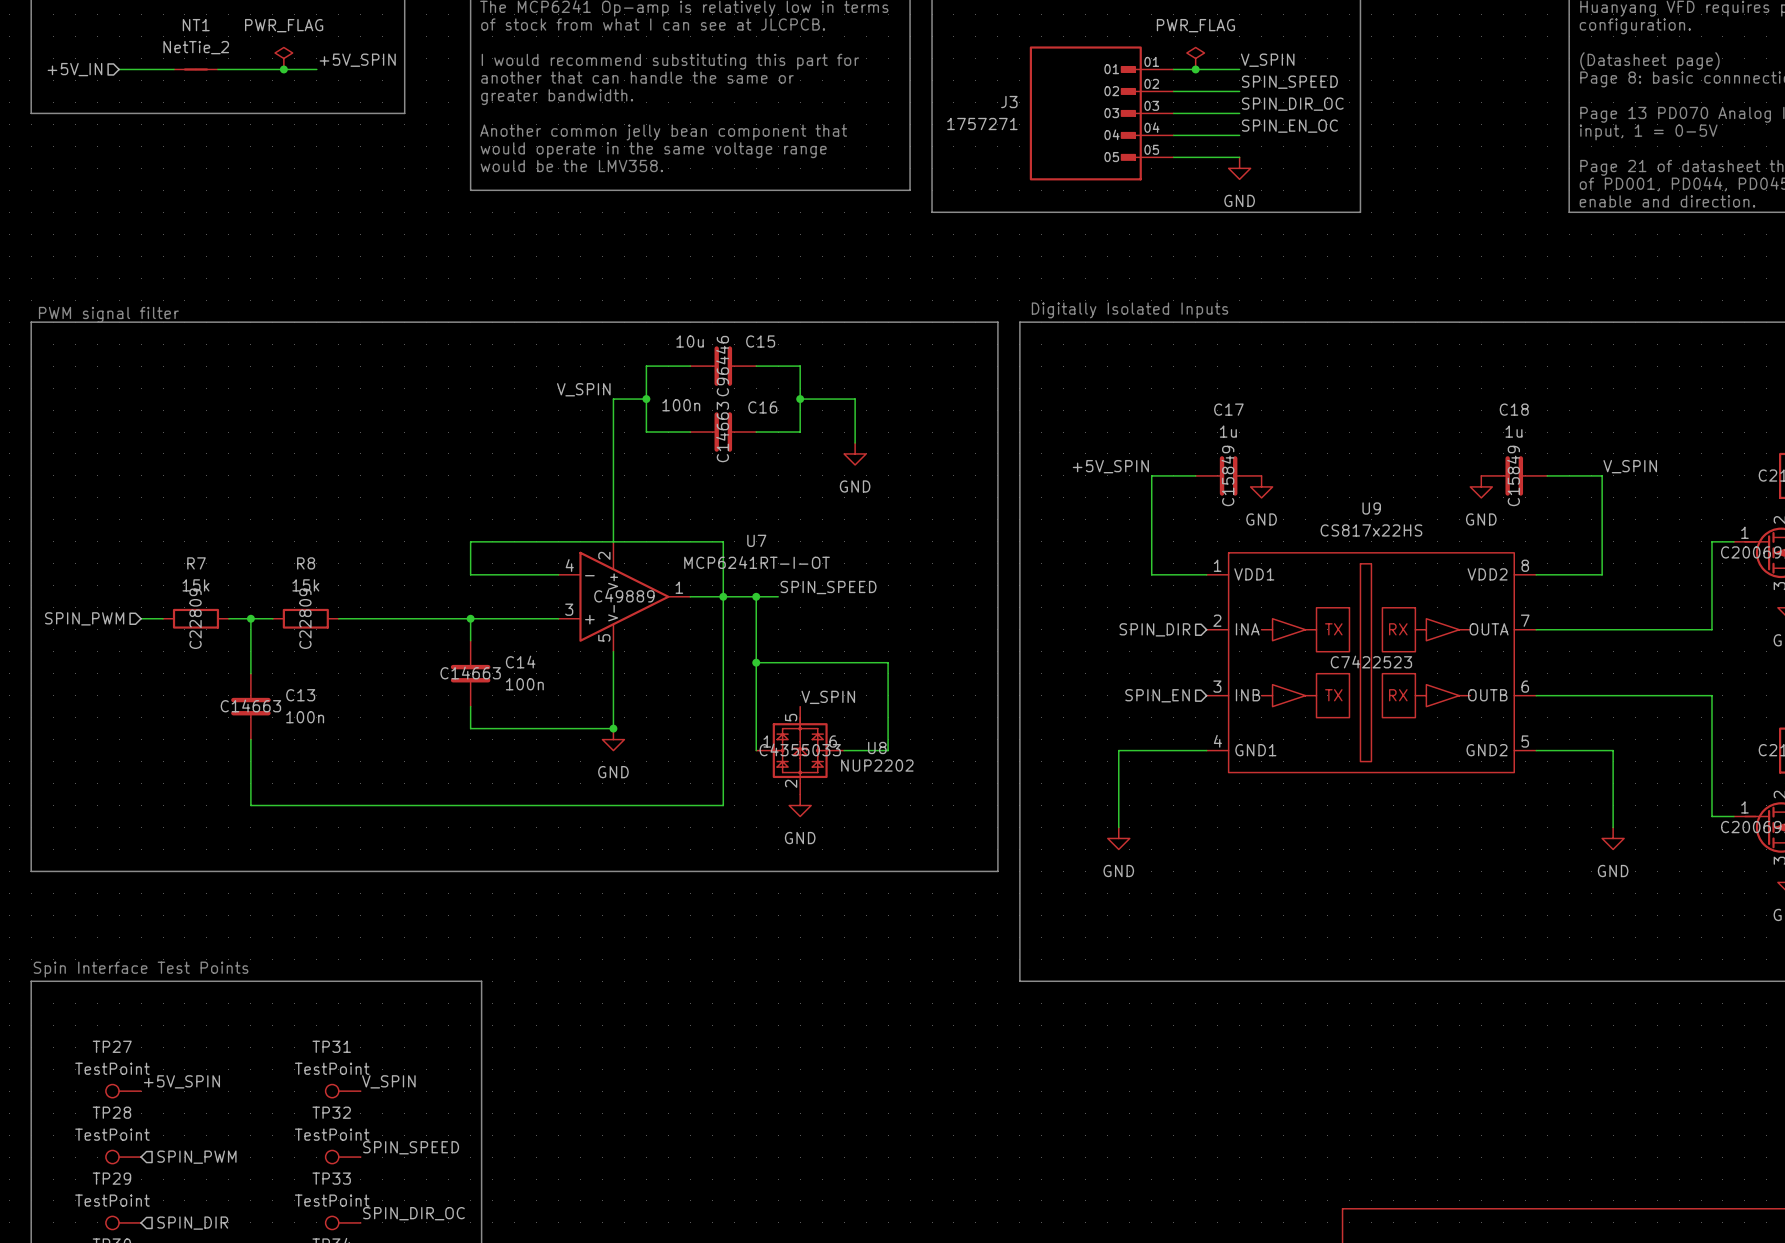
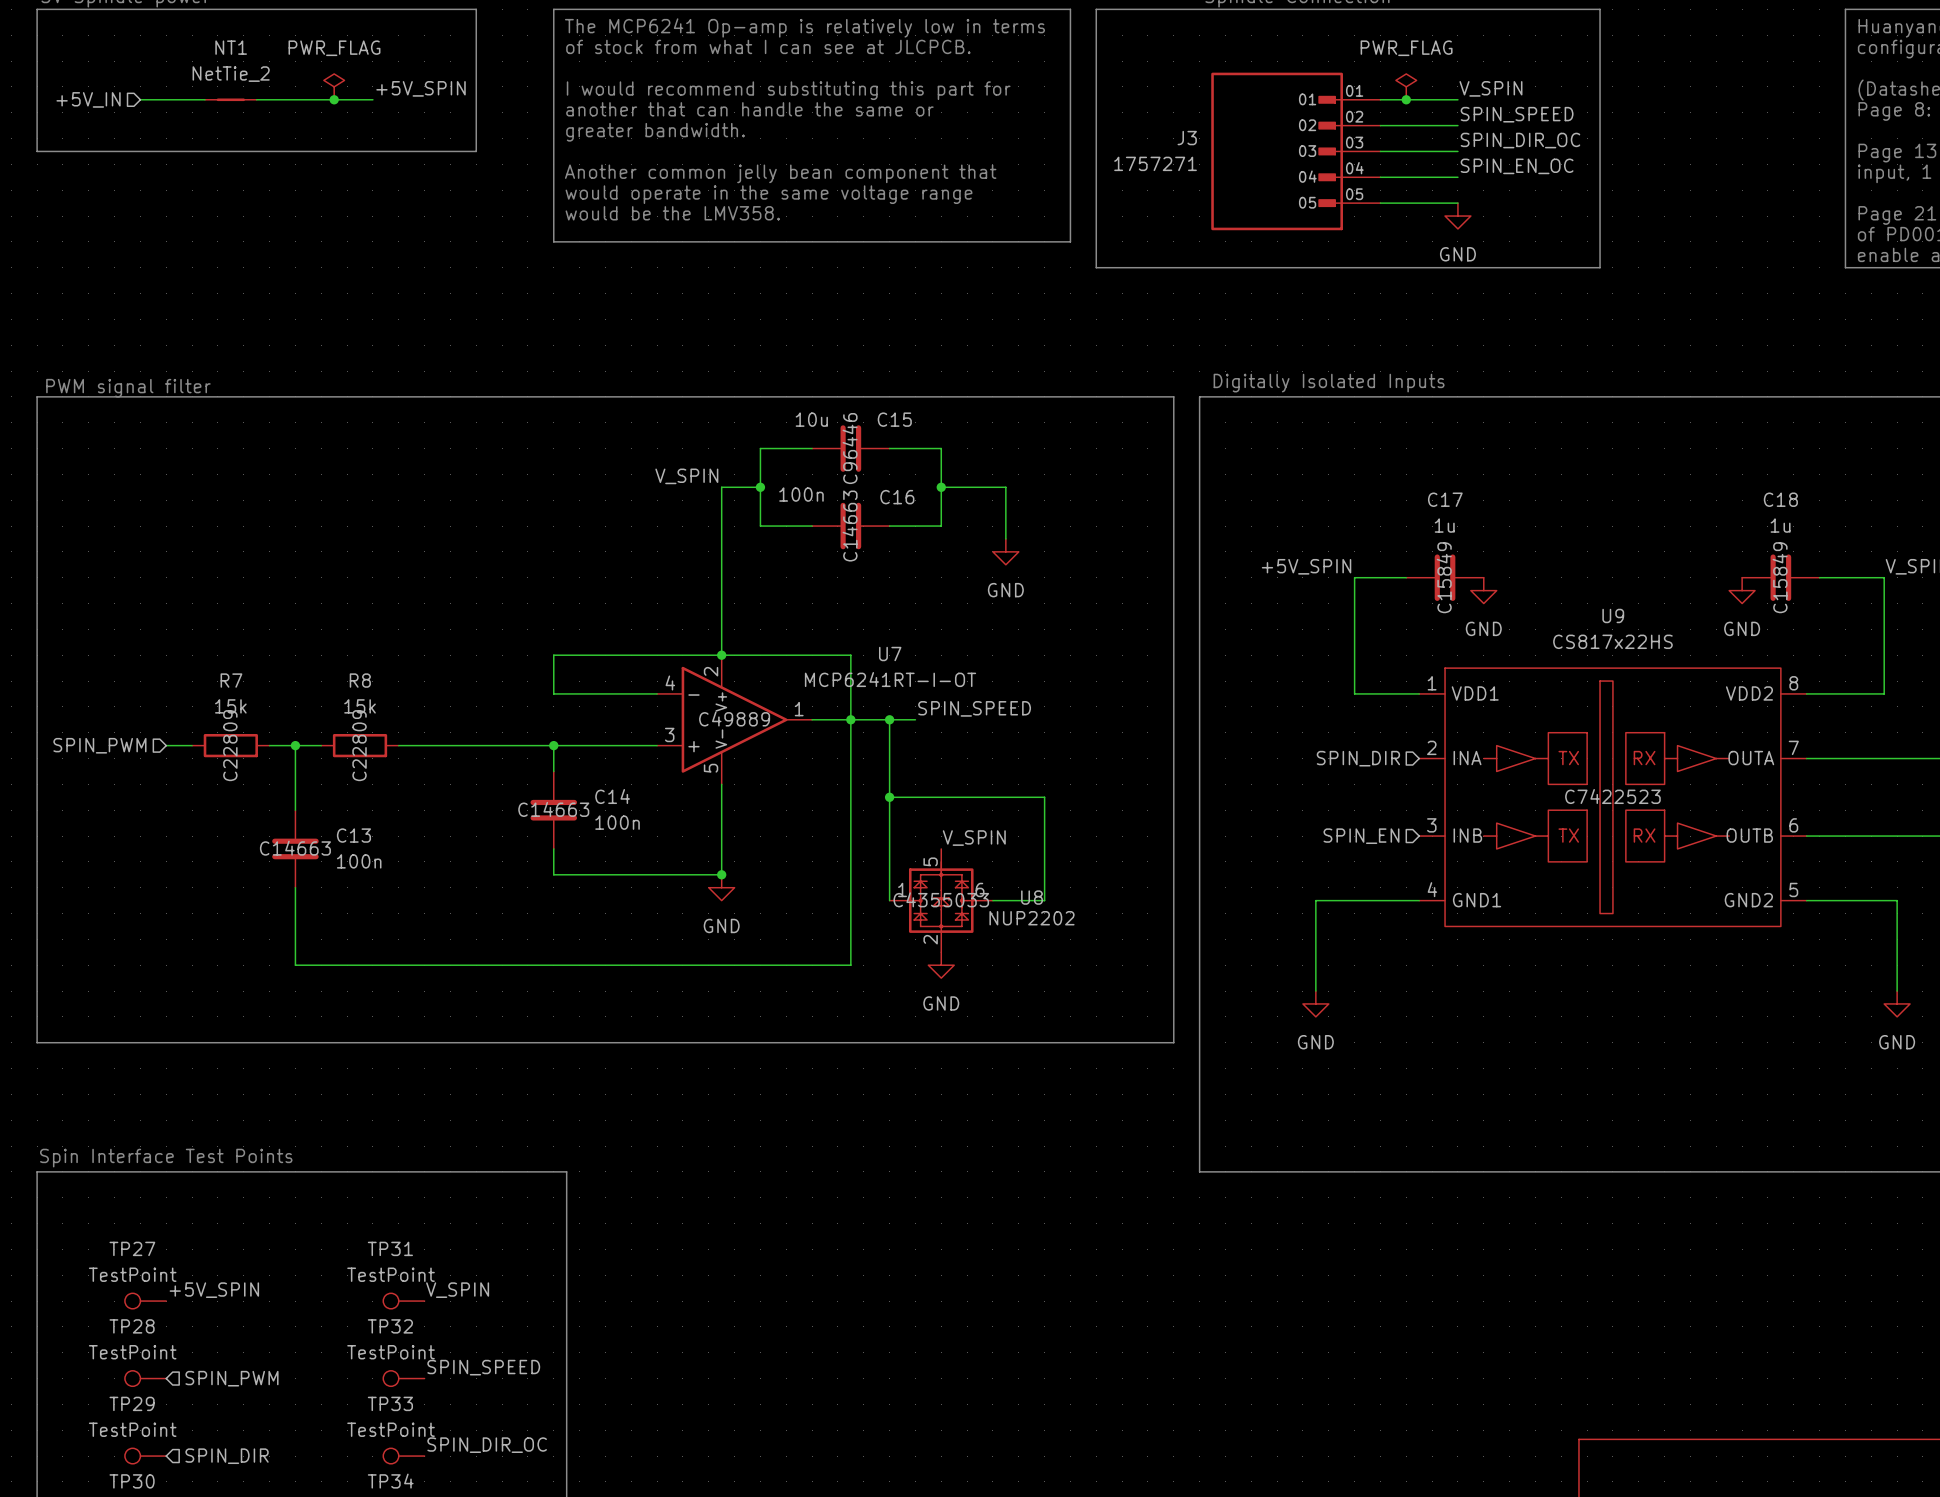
junction: none -> (721, 655)

